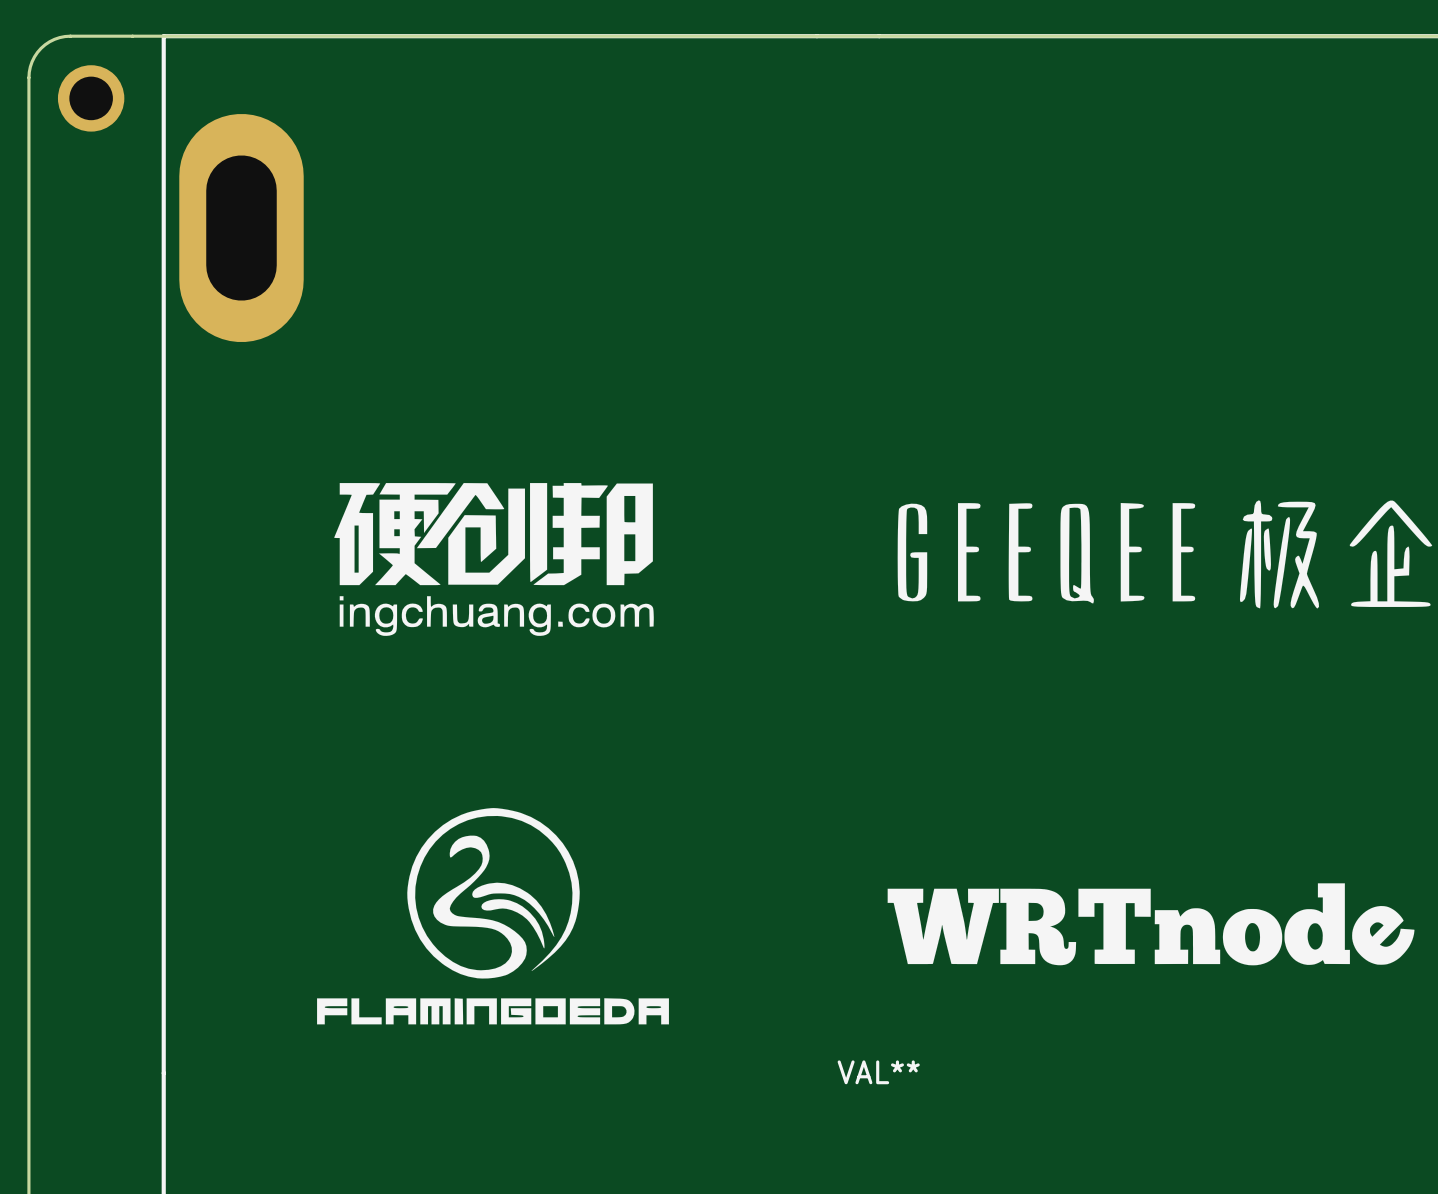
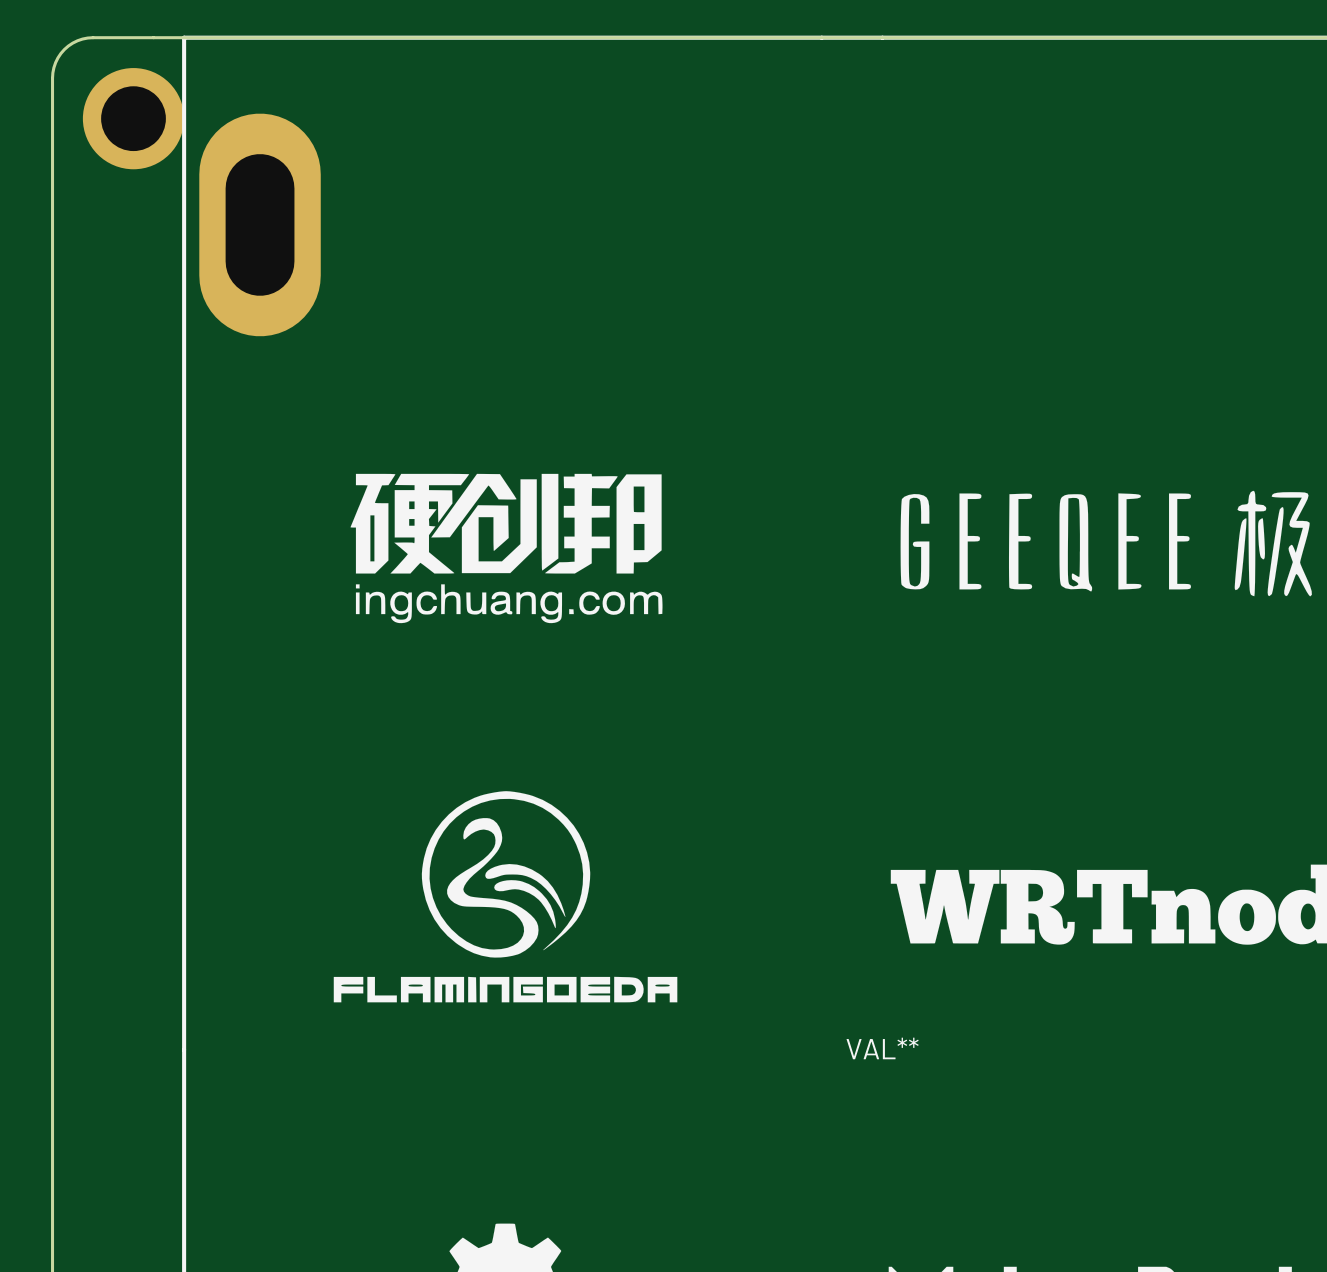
part: (91, 98) -> none
part: none -> (133, 118)

